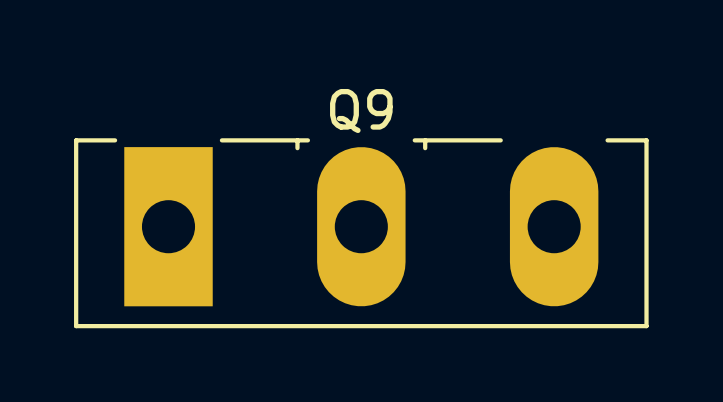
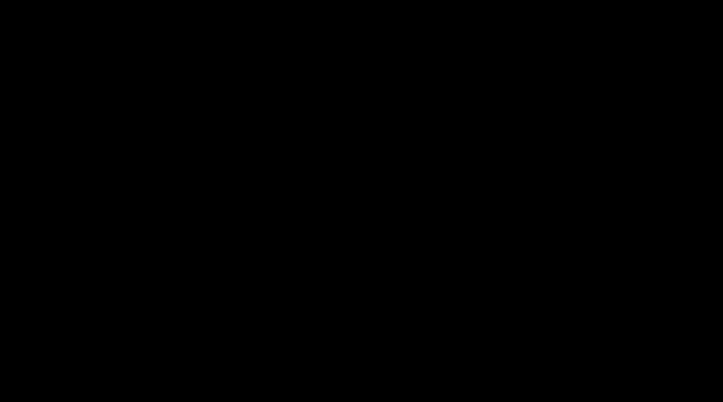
Q9: (361, 233) -> none

